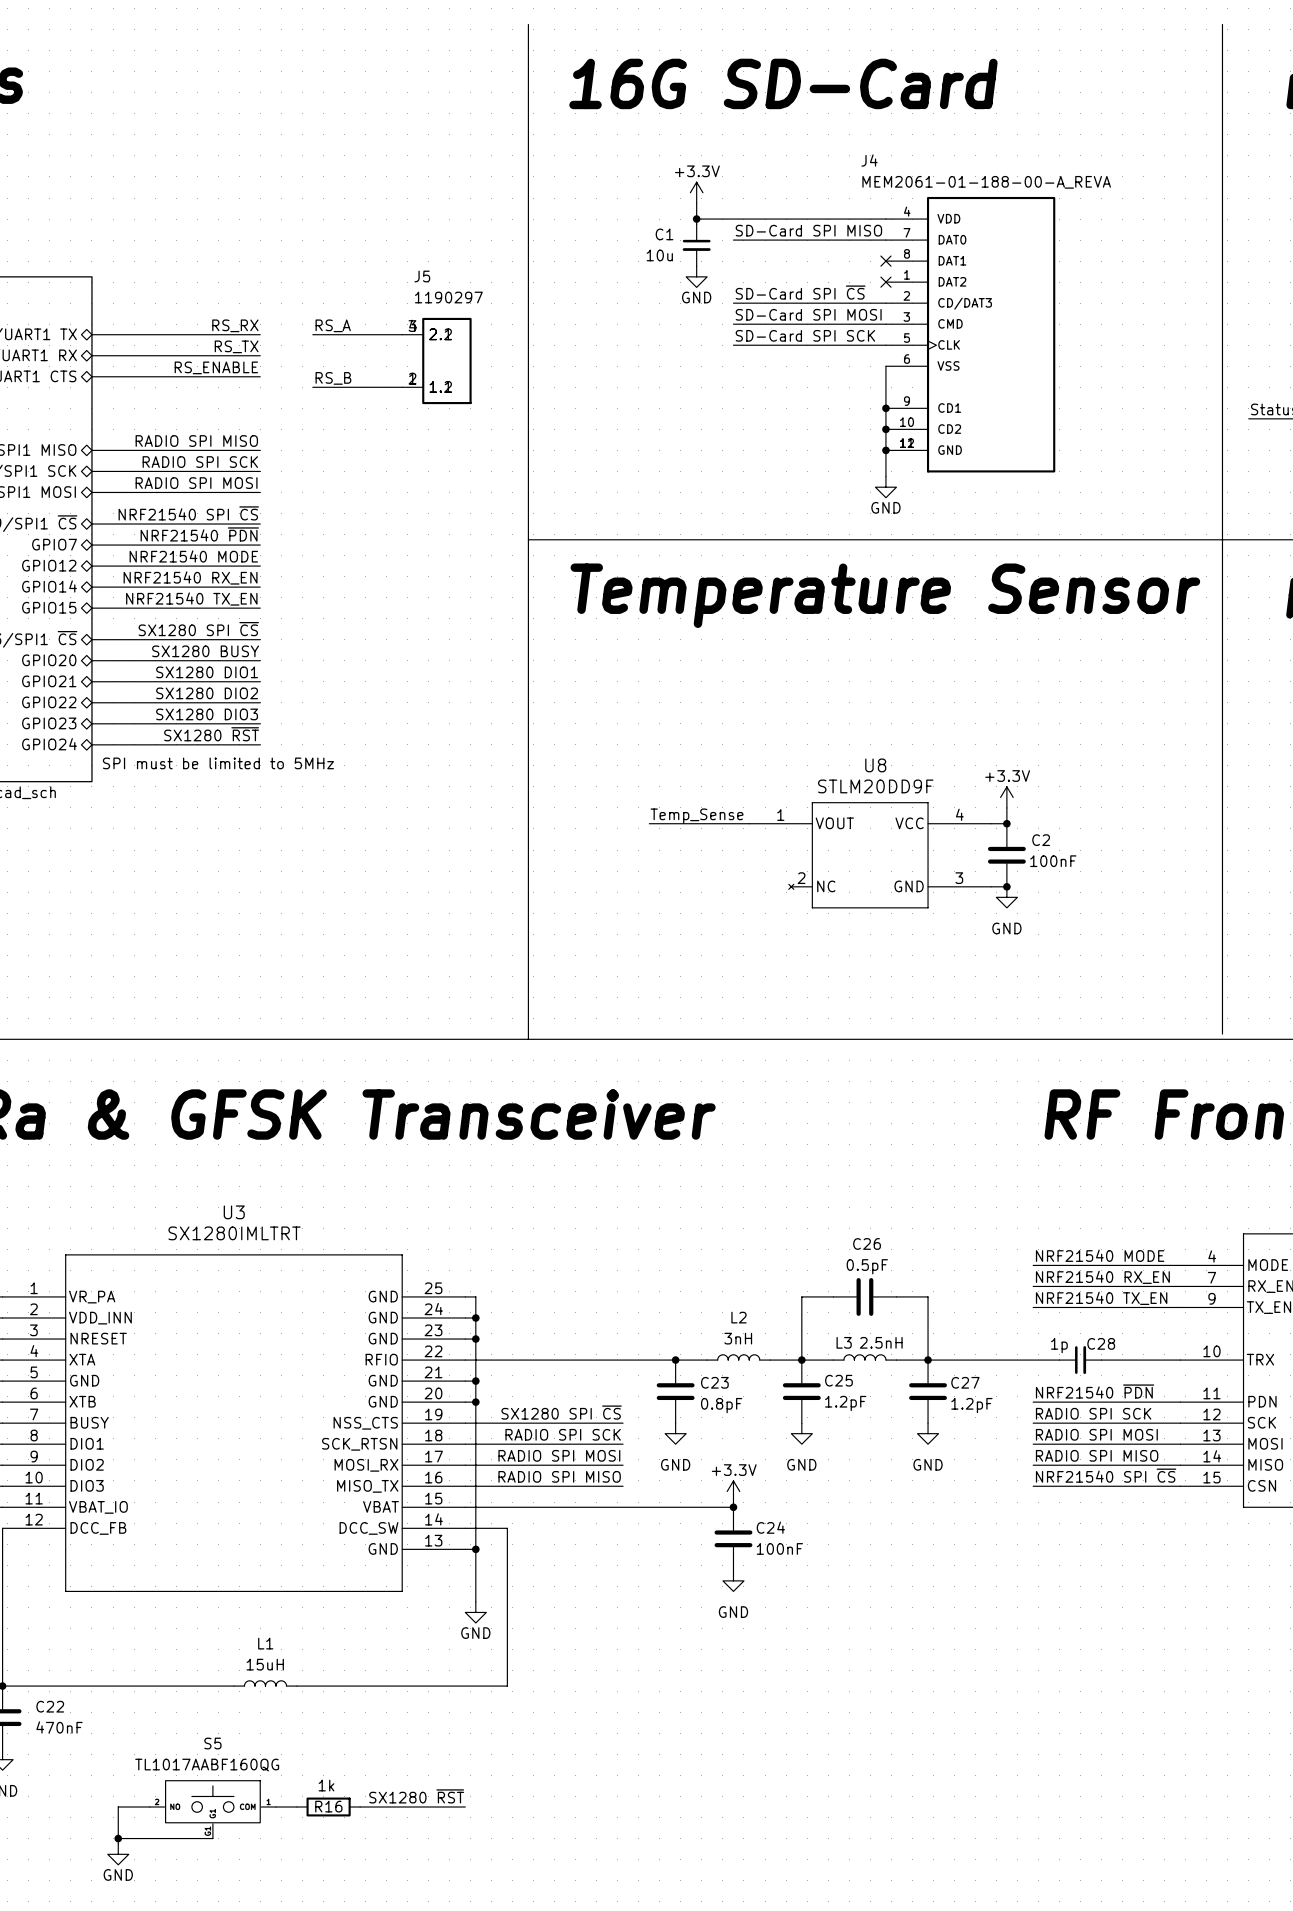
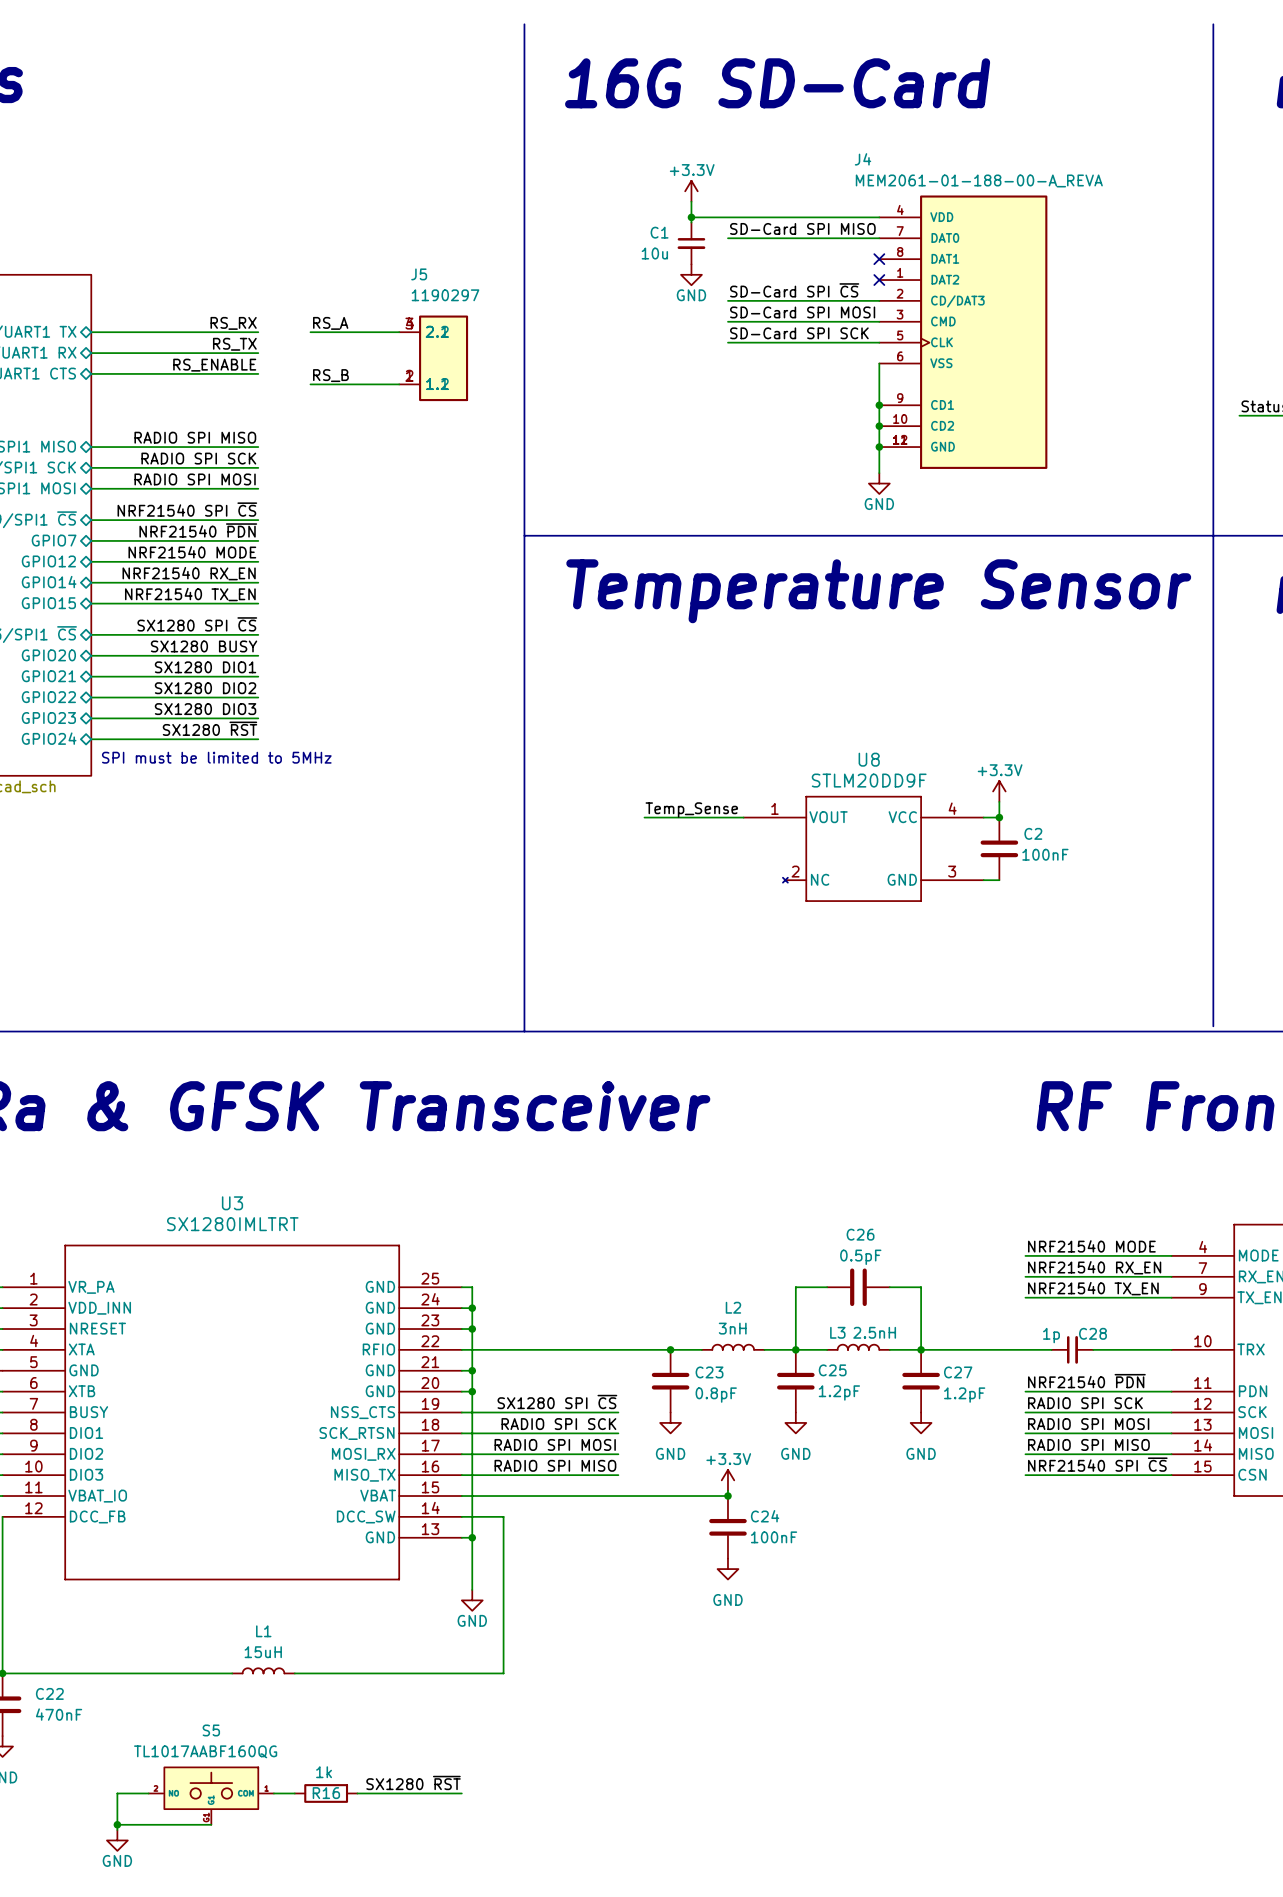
junction: (1006, 886) -> none
power symbol: GND (1006, 897) -> none

